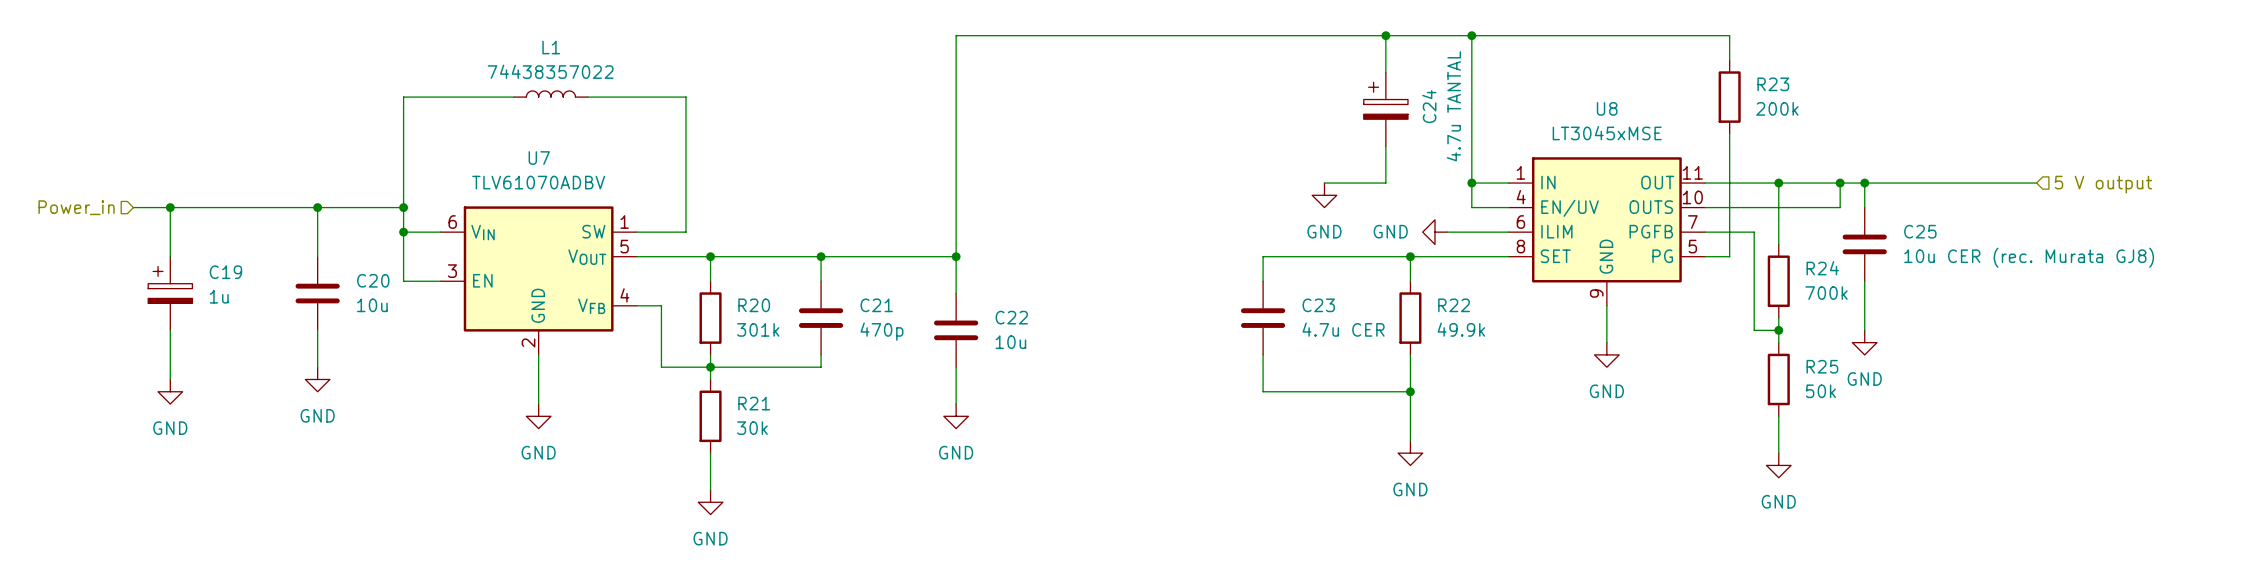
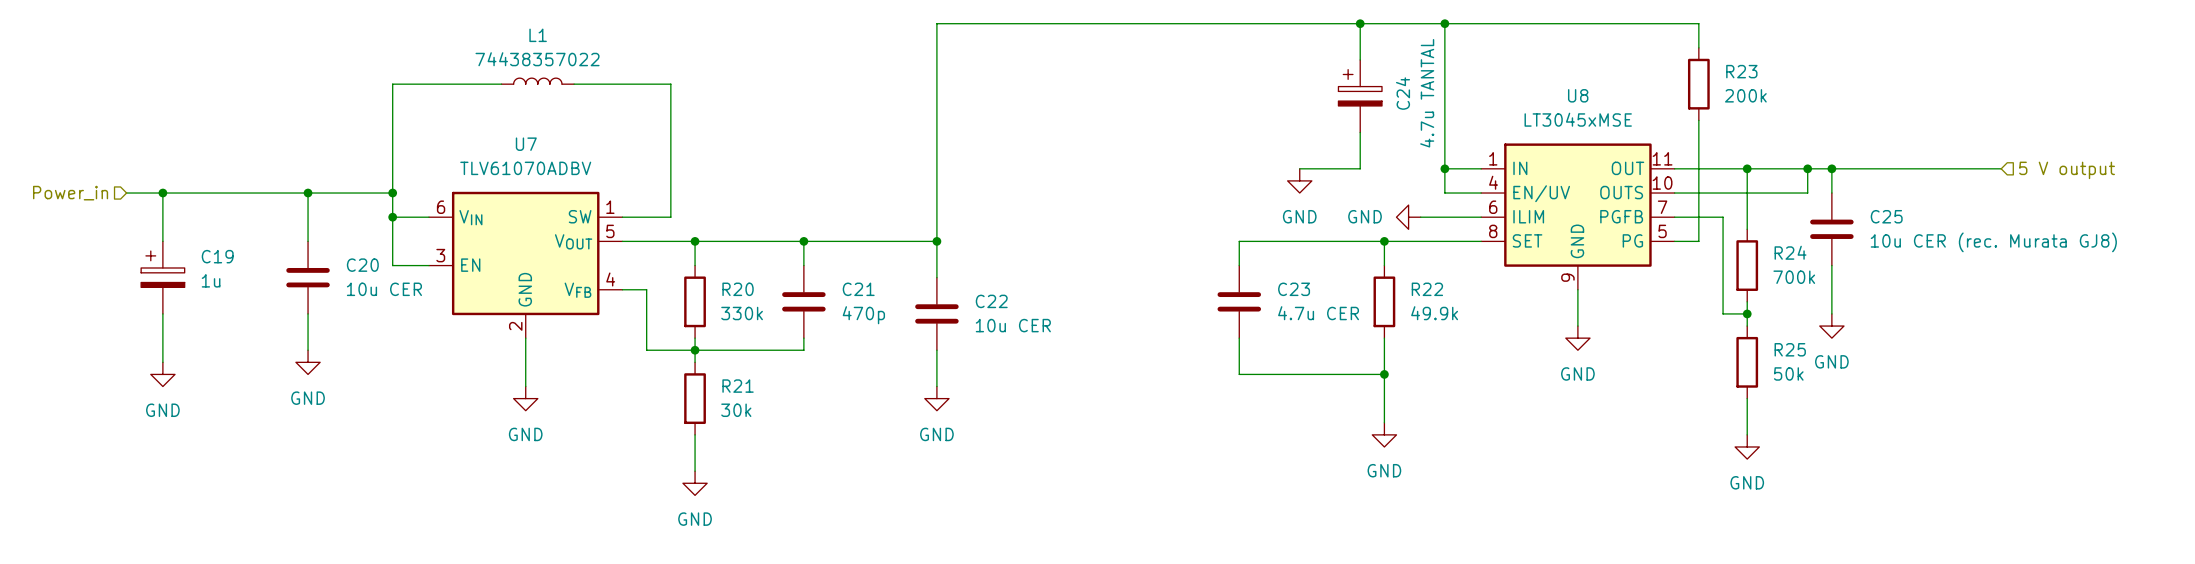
C20 value: 10u (372, 305) -> 10u CER (384, 289)
R20 value: 301k (758, 329) -> 330k (742, 313)
C22 value: 10u (1010, 342) -> 10u CER (1013, 325)

